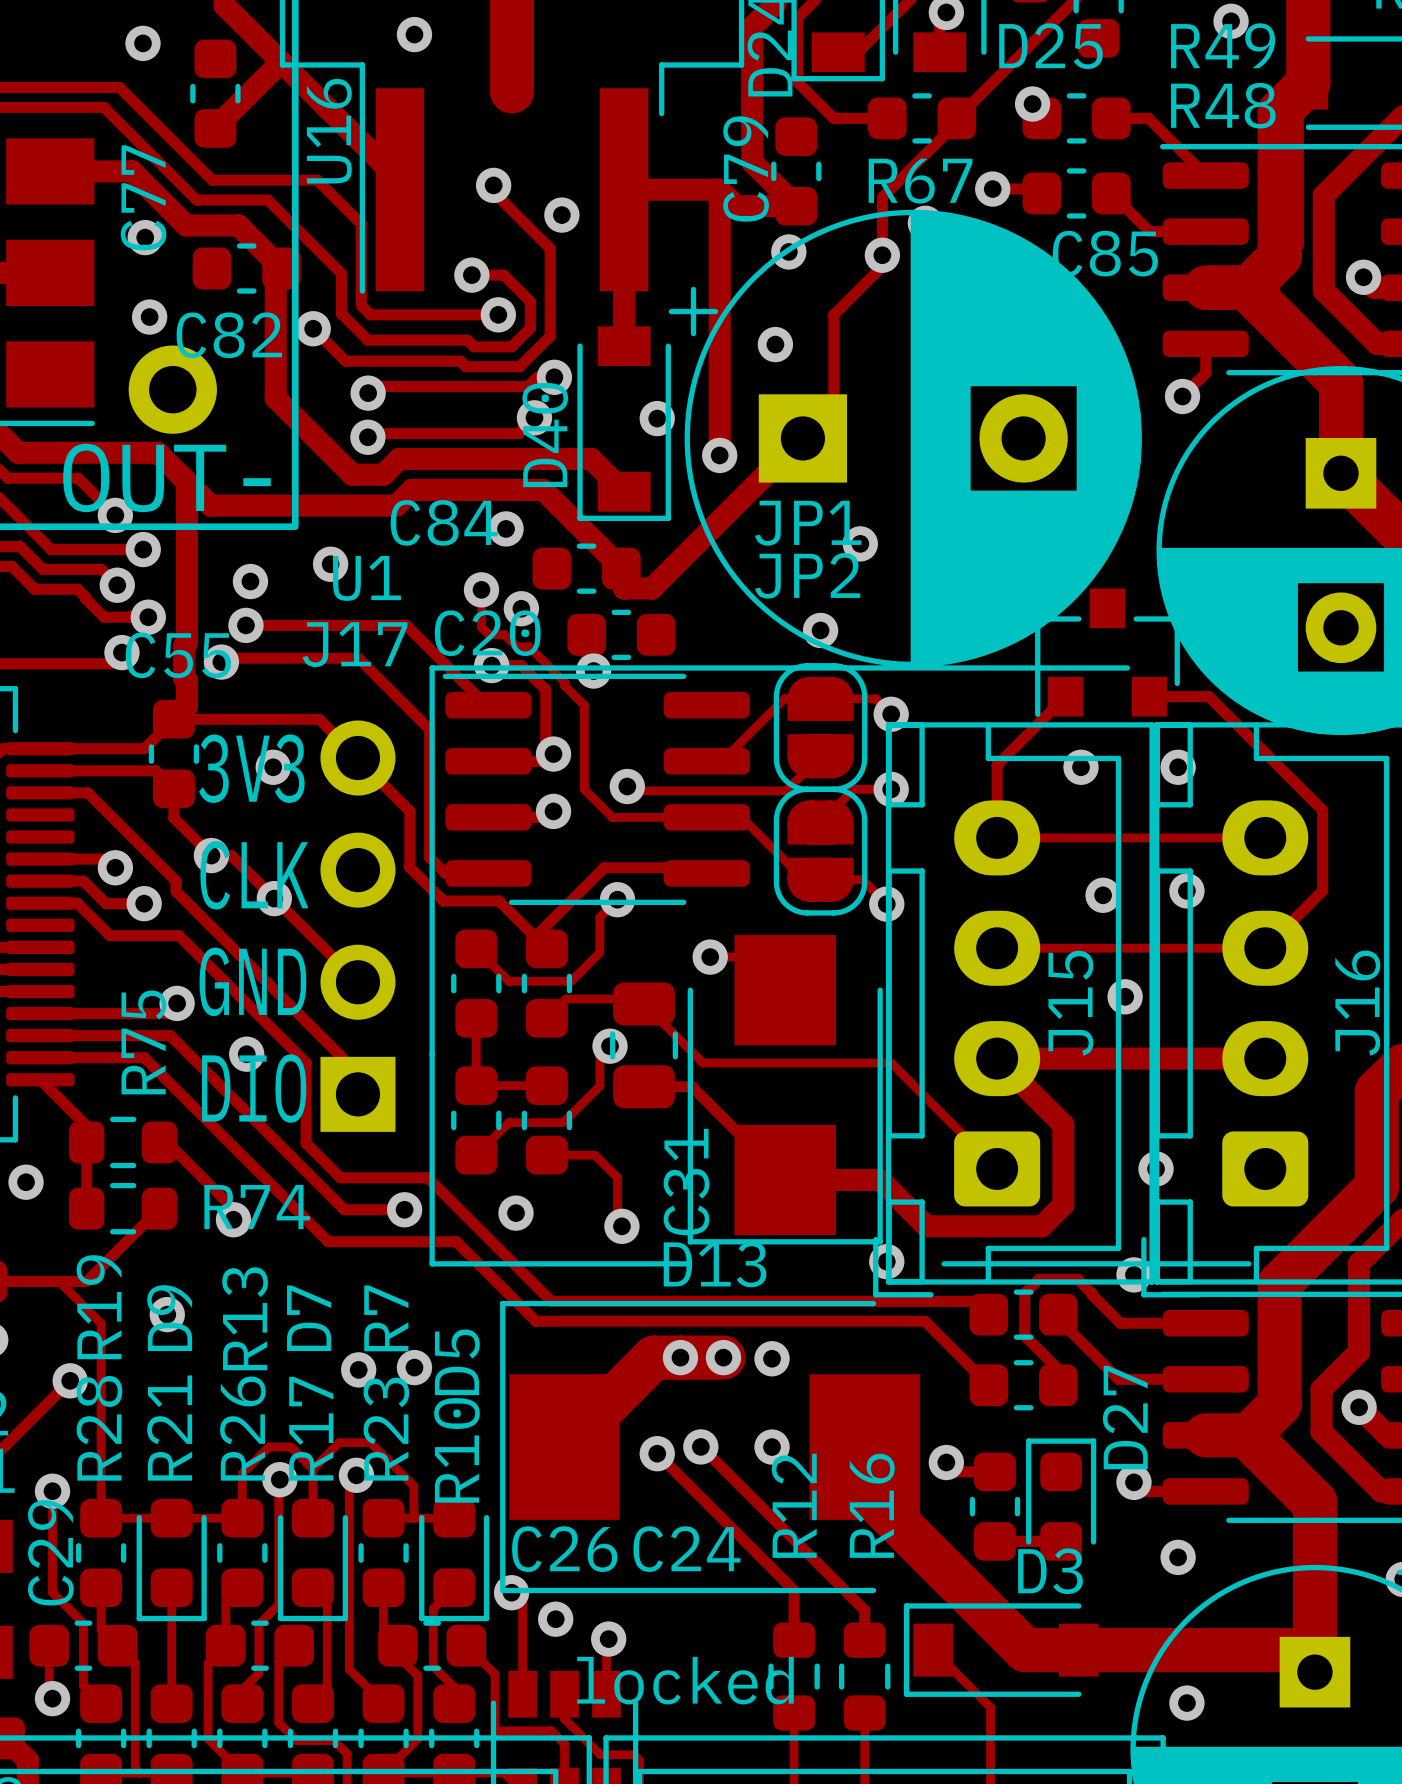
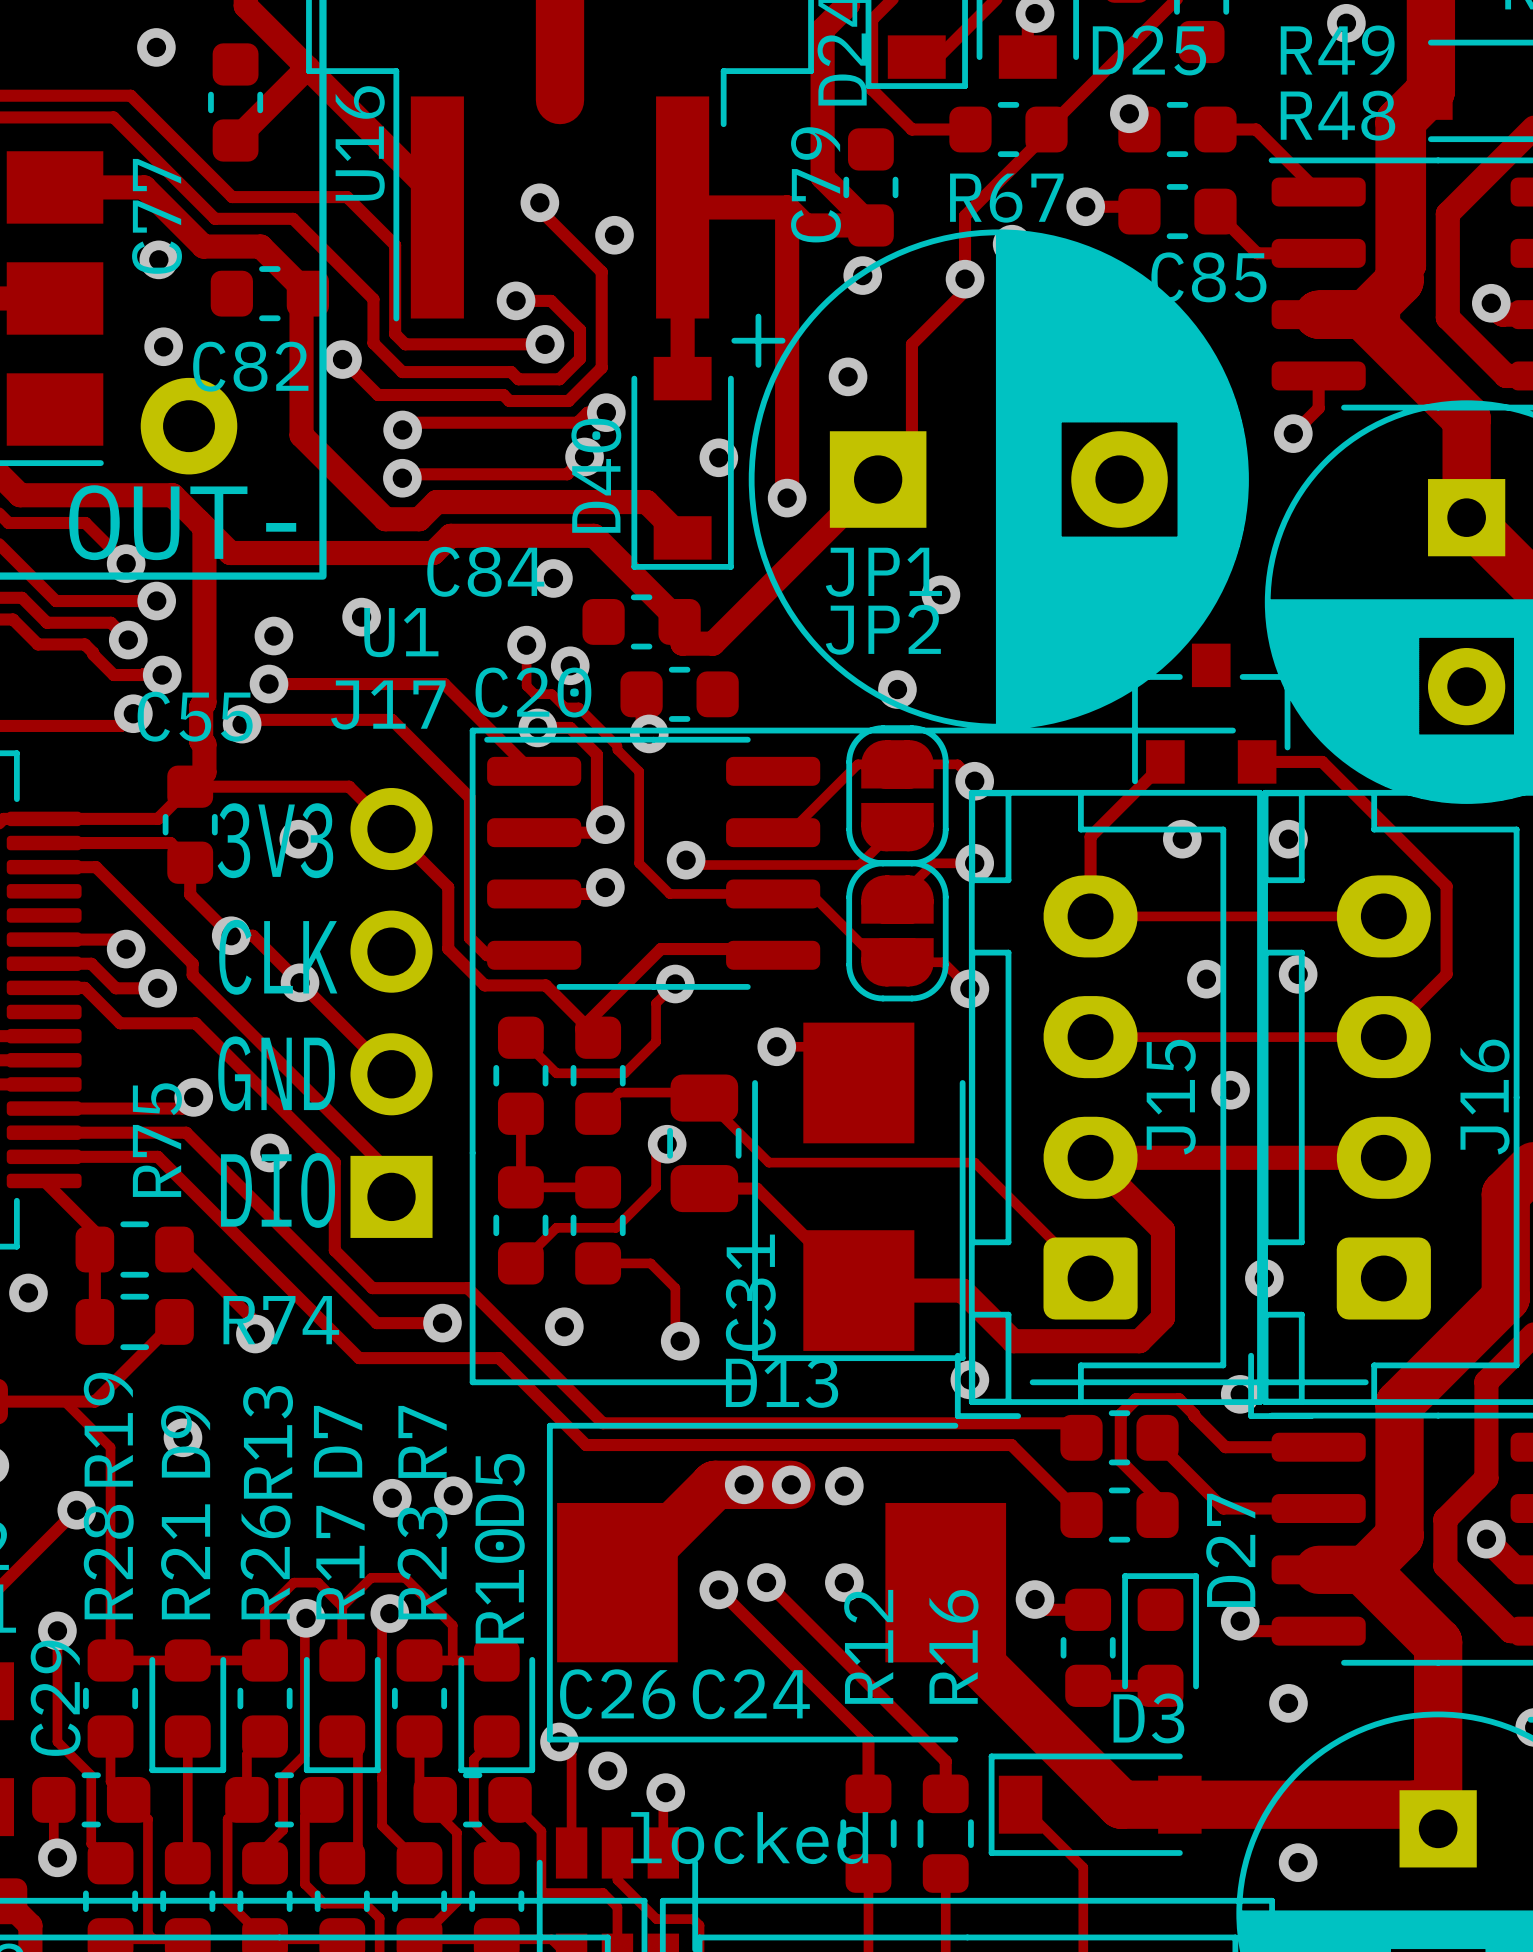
via: (414, 34) -> none

